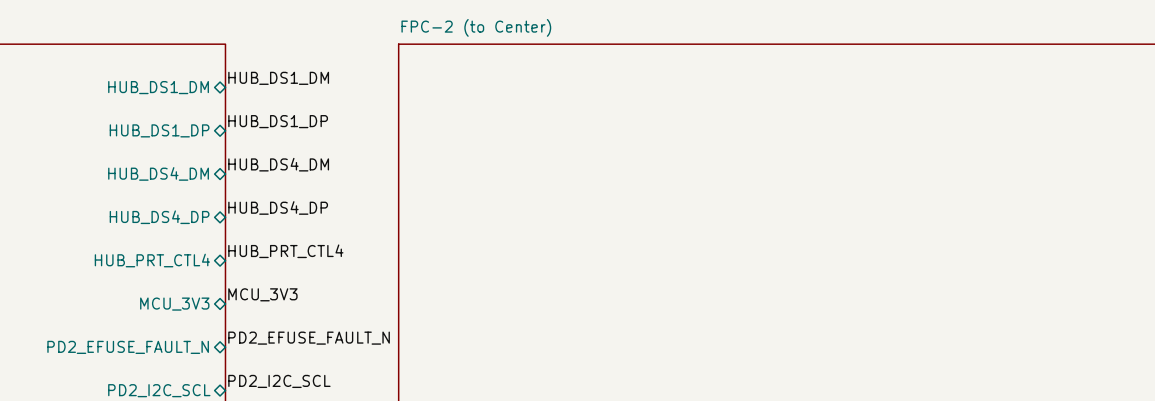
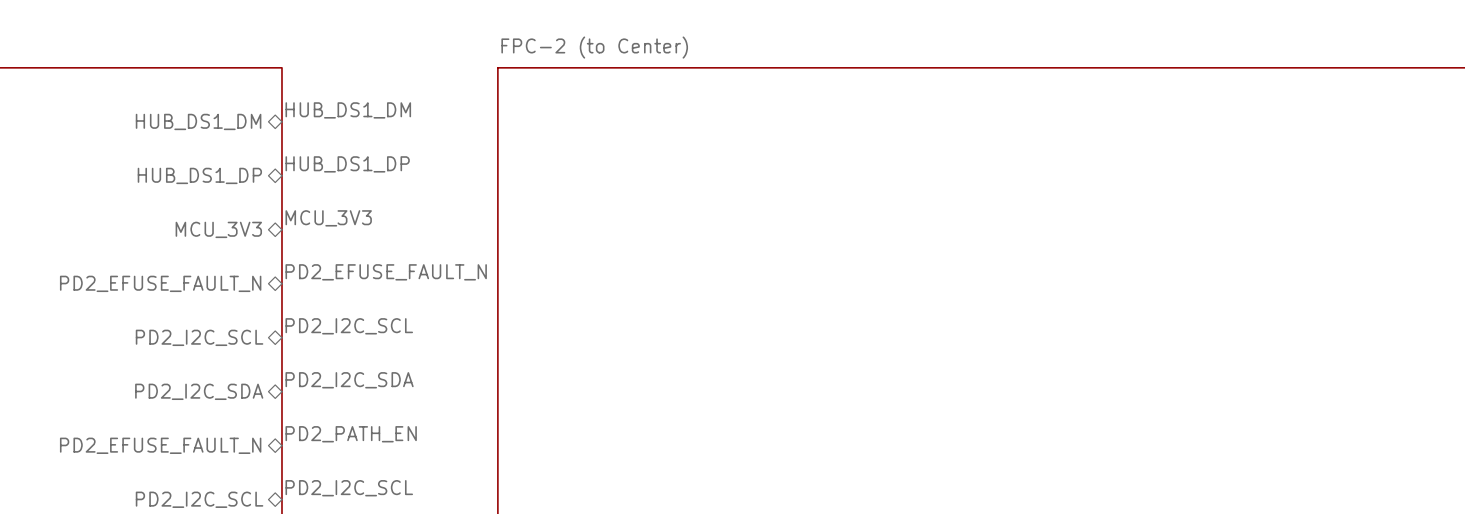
label: HUB_DS4_DM (278, 164) -> MCU_3V3 (328, 218)
sheet pin: HUB_DS4_DM (158, 173) -> MCU_3V3 (218, 229)
label: HUB_DS4_DP (278, 207) -> PD2_EFUSE_FAULT_N (386, 272)
sheet pin: HUB_DS4_DP (159, 217) -> PD2_EFUSE_FAULT_N (160, 283)
label: HUB_PRT_CTL4 (285, 251) -> PD2_I2C_SCL (349, 326)
sheet pin: HUB_PRT_CTL4 (152, 260) -> PD2_I2C_SCL (199, 337)
label: MCU_3V3 (262, 294) -> PD2_I2C_SDA (349, 380)
sheet pin: MCU_3V3 (174, 304) -> PD2_I2C_SDA (199, 391)
label: PD2_EFUSE_FAULT_N (309, 338) -> PD2_PATH_EN (351, 434)

